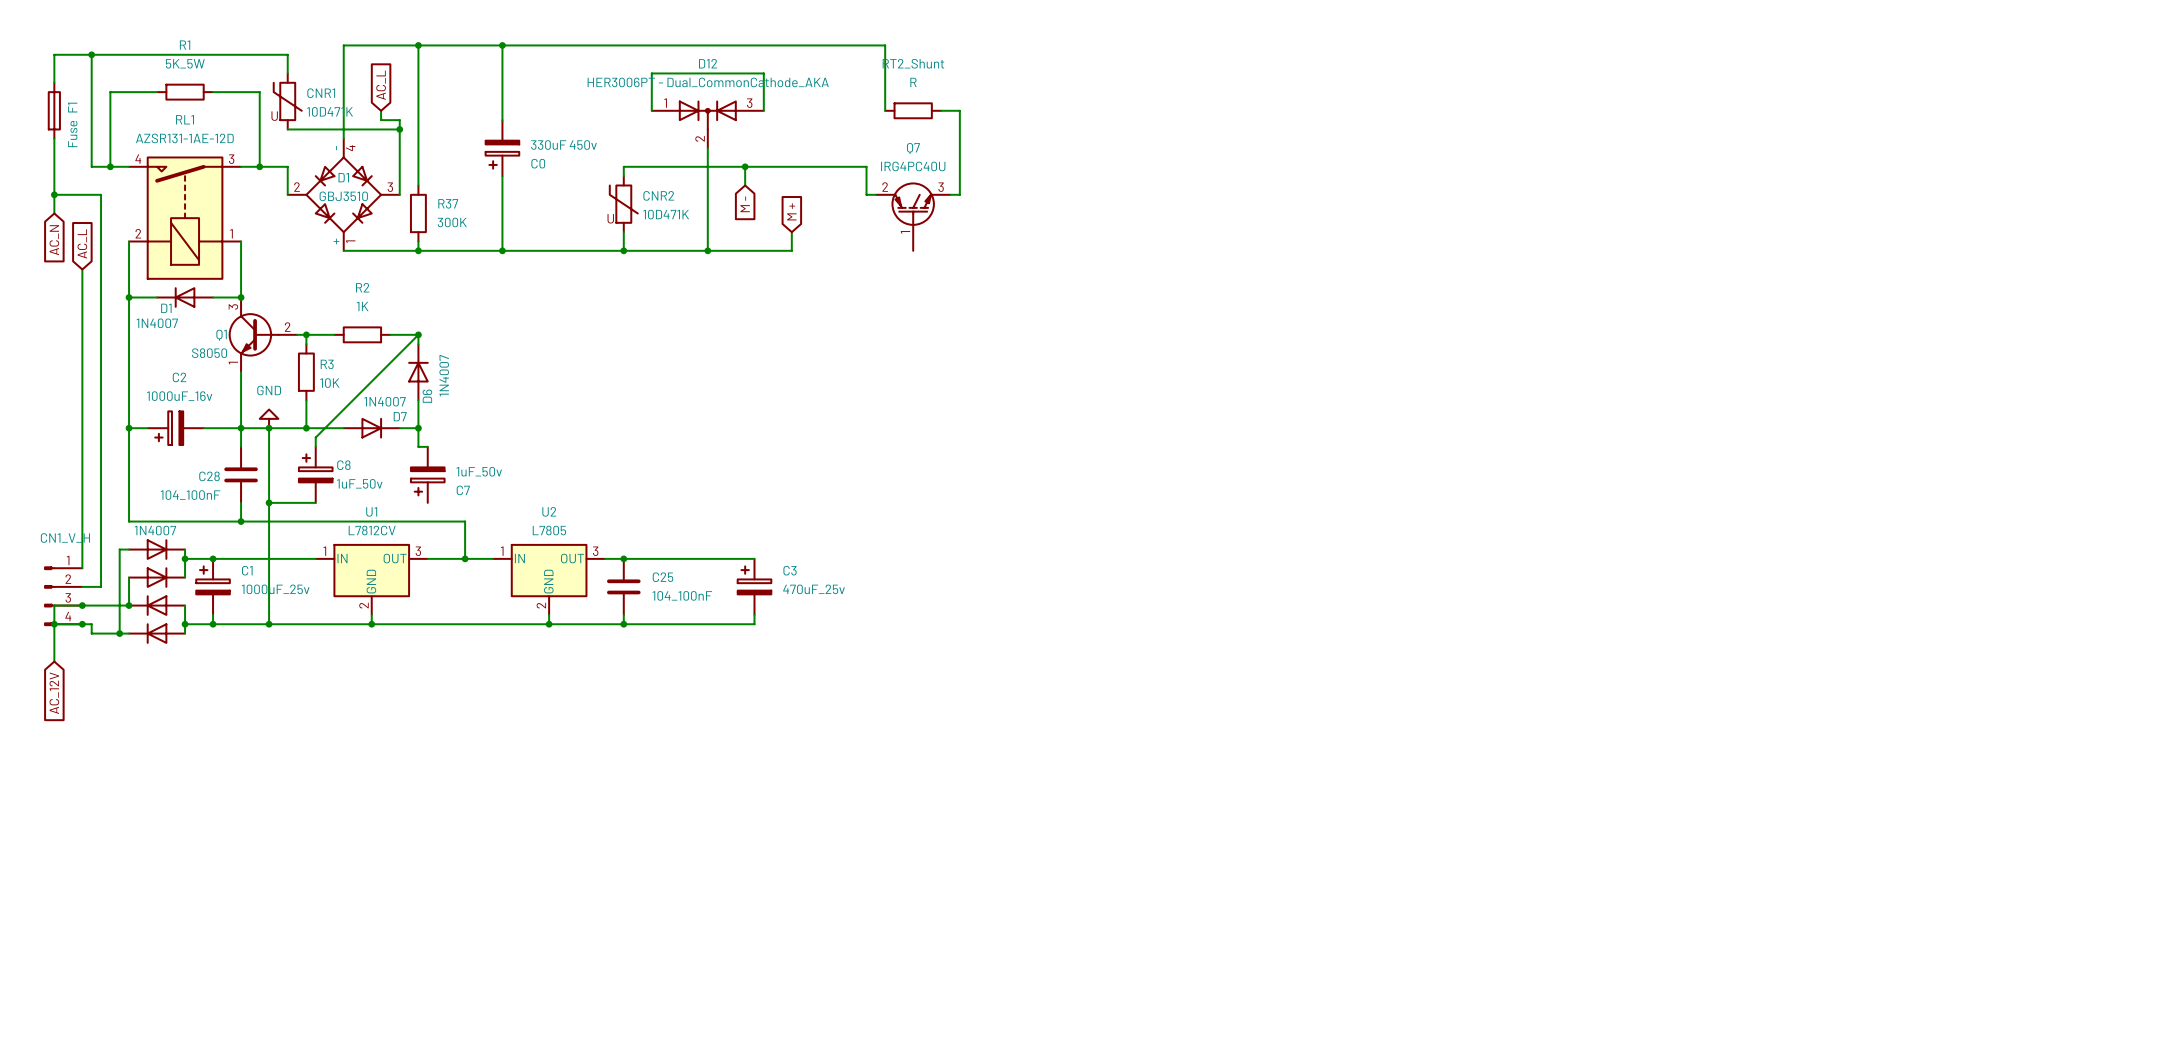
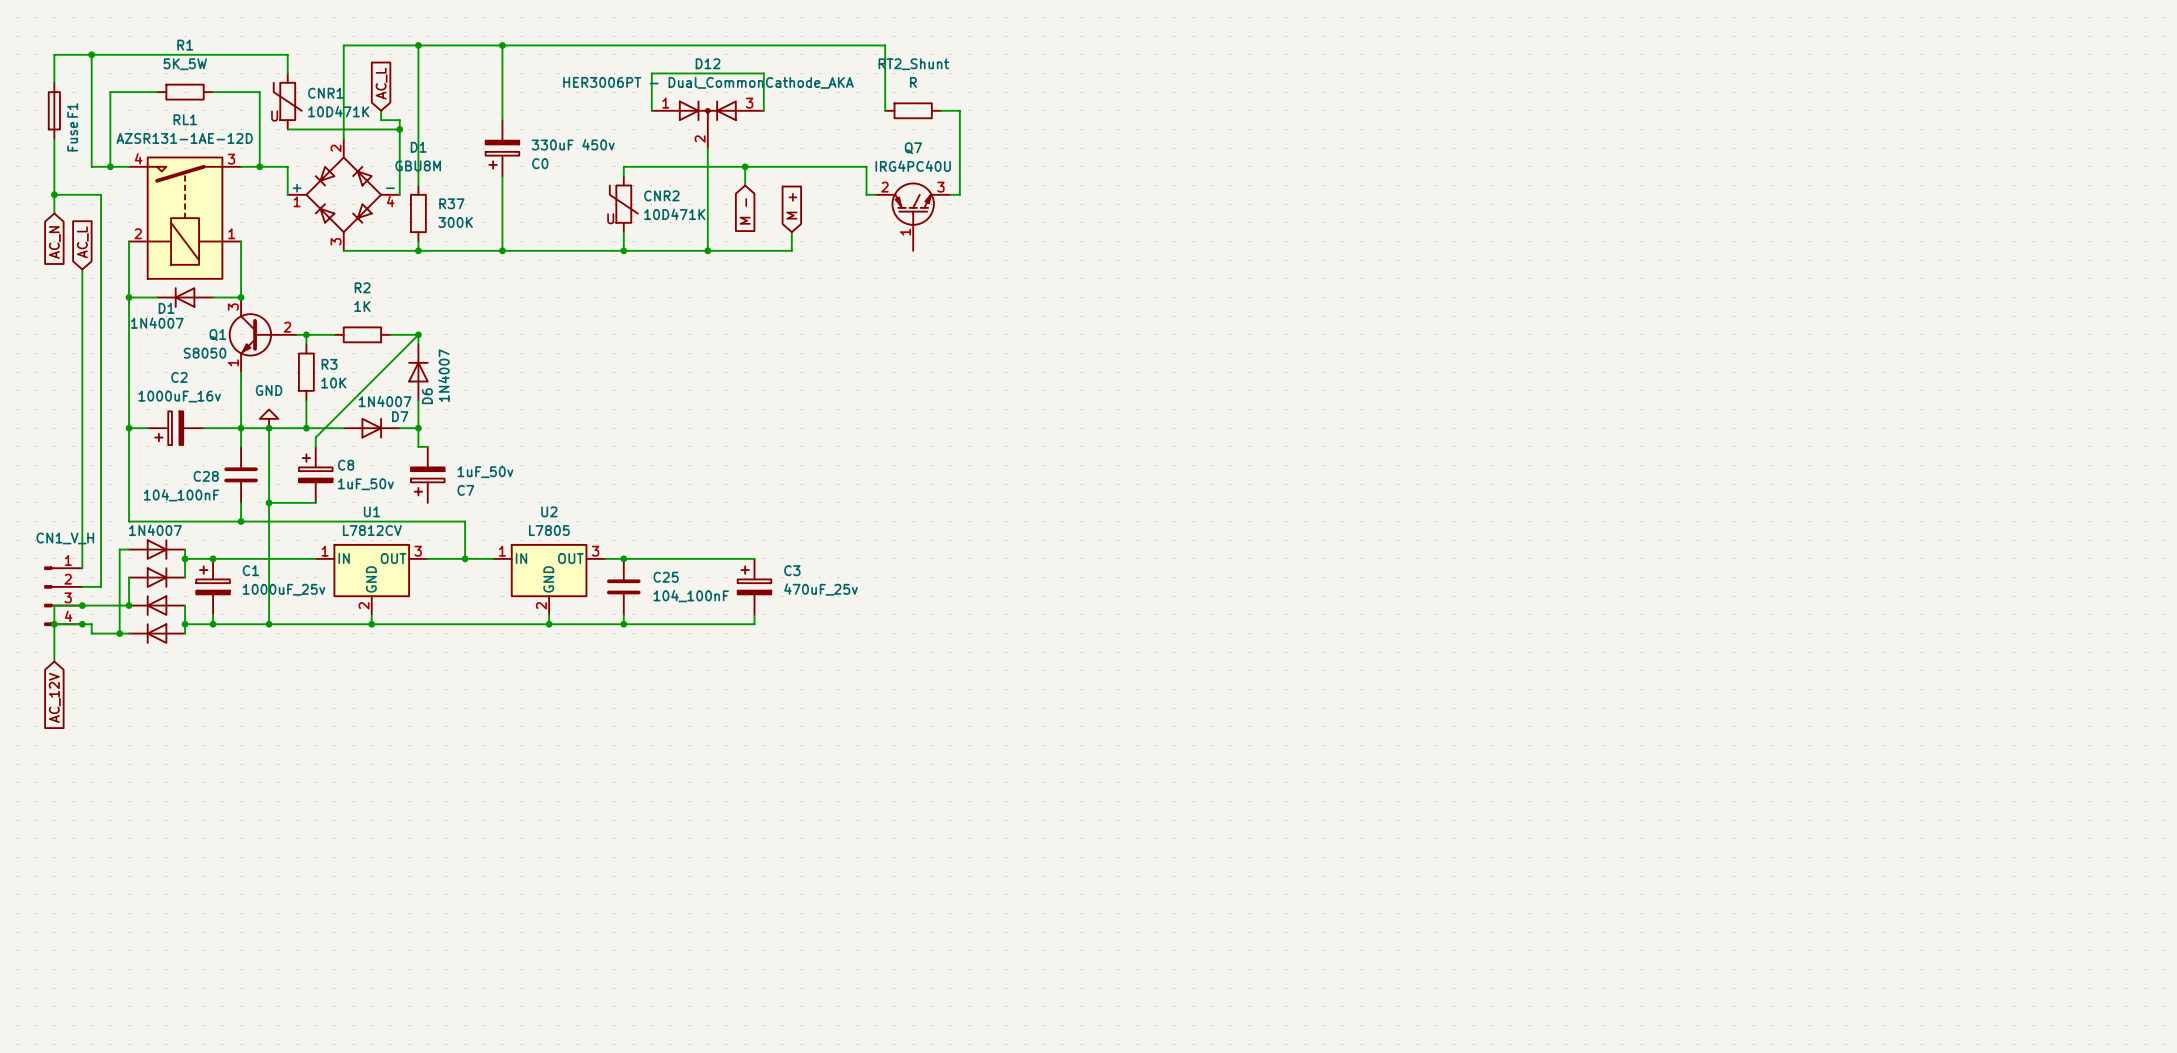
D1 name position: D1 (343, 177) -> D1 (418, 147)
D1 rotation: 0° (343, 194) -> 90° clockwise (343, 194)
D1 value: GBJ3510 (343, 196) -> GBU8M (418, 165)

